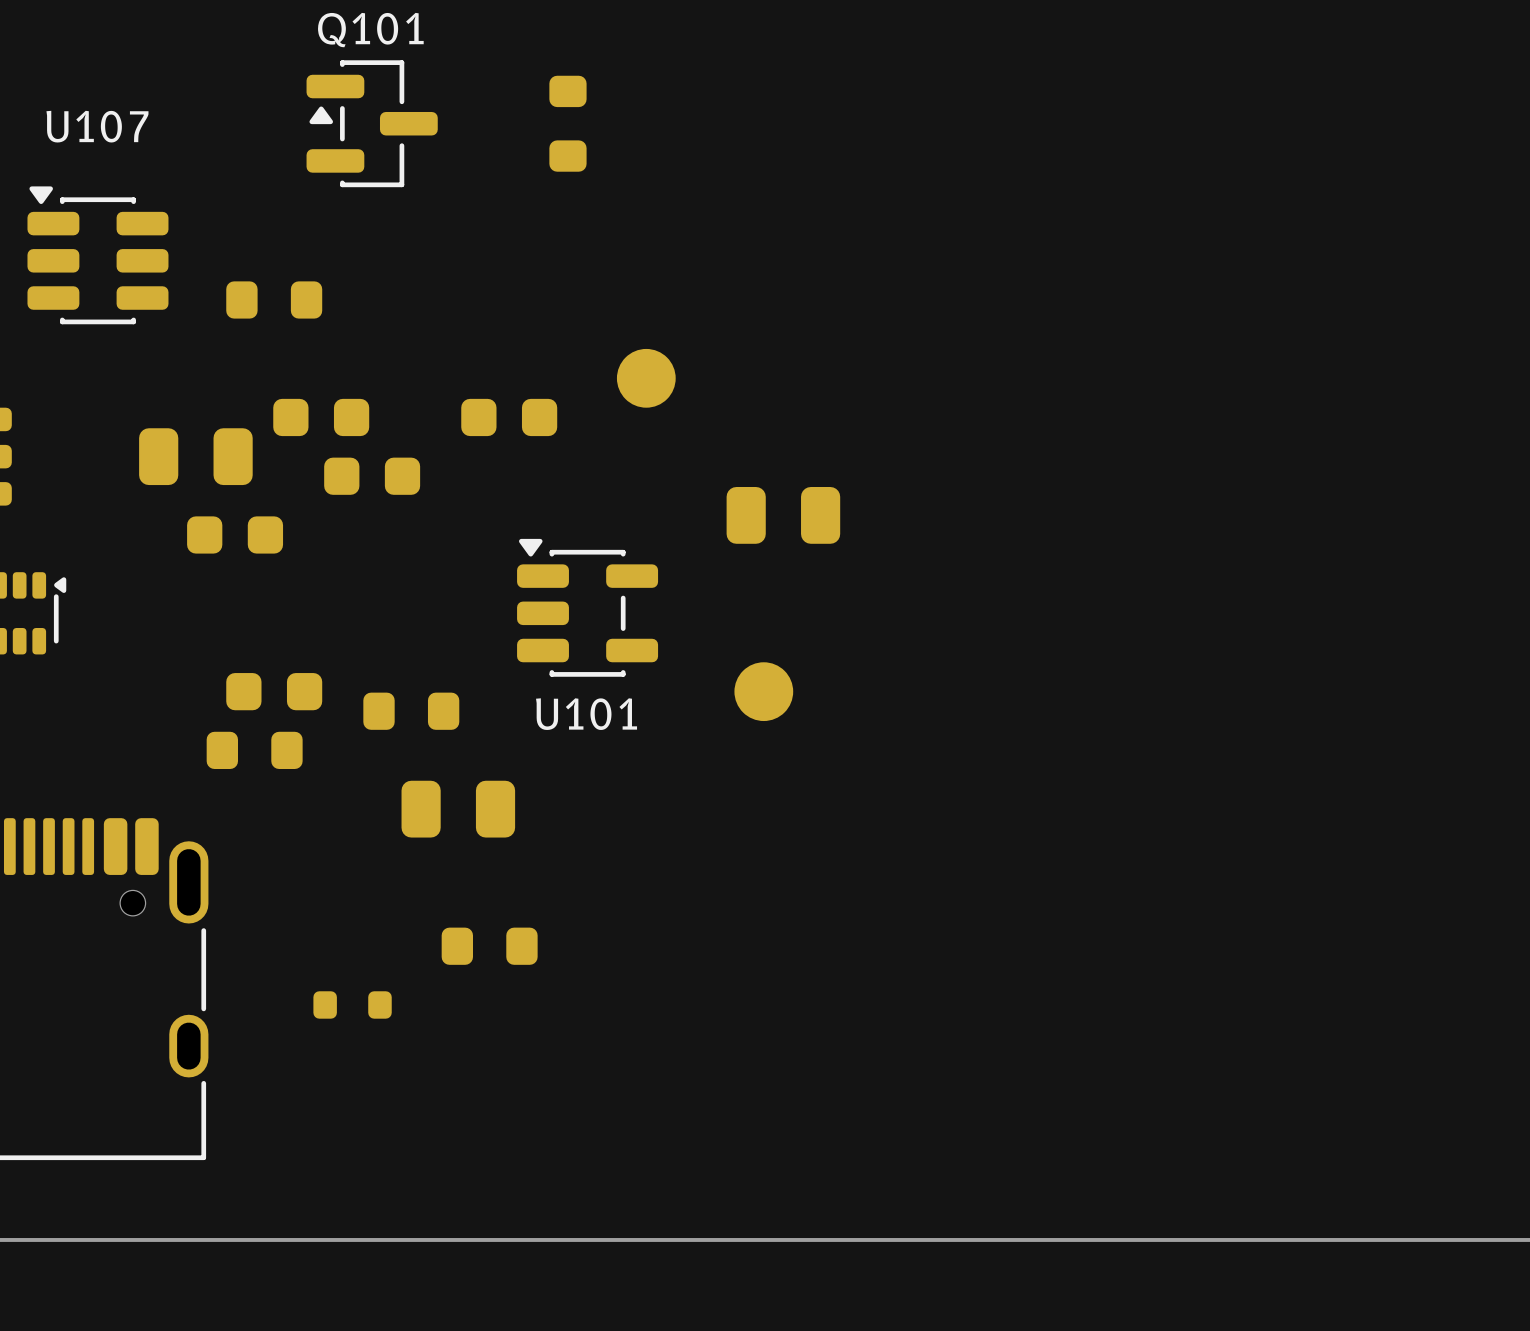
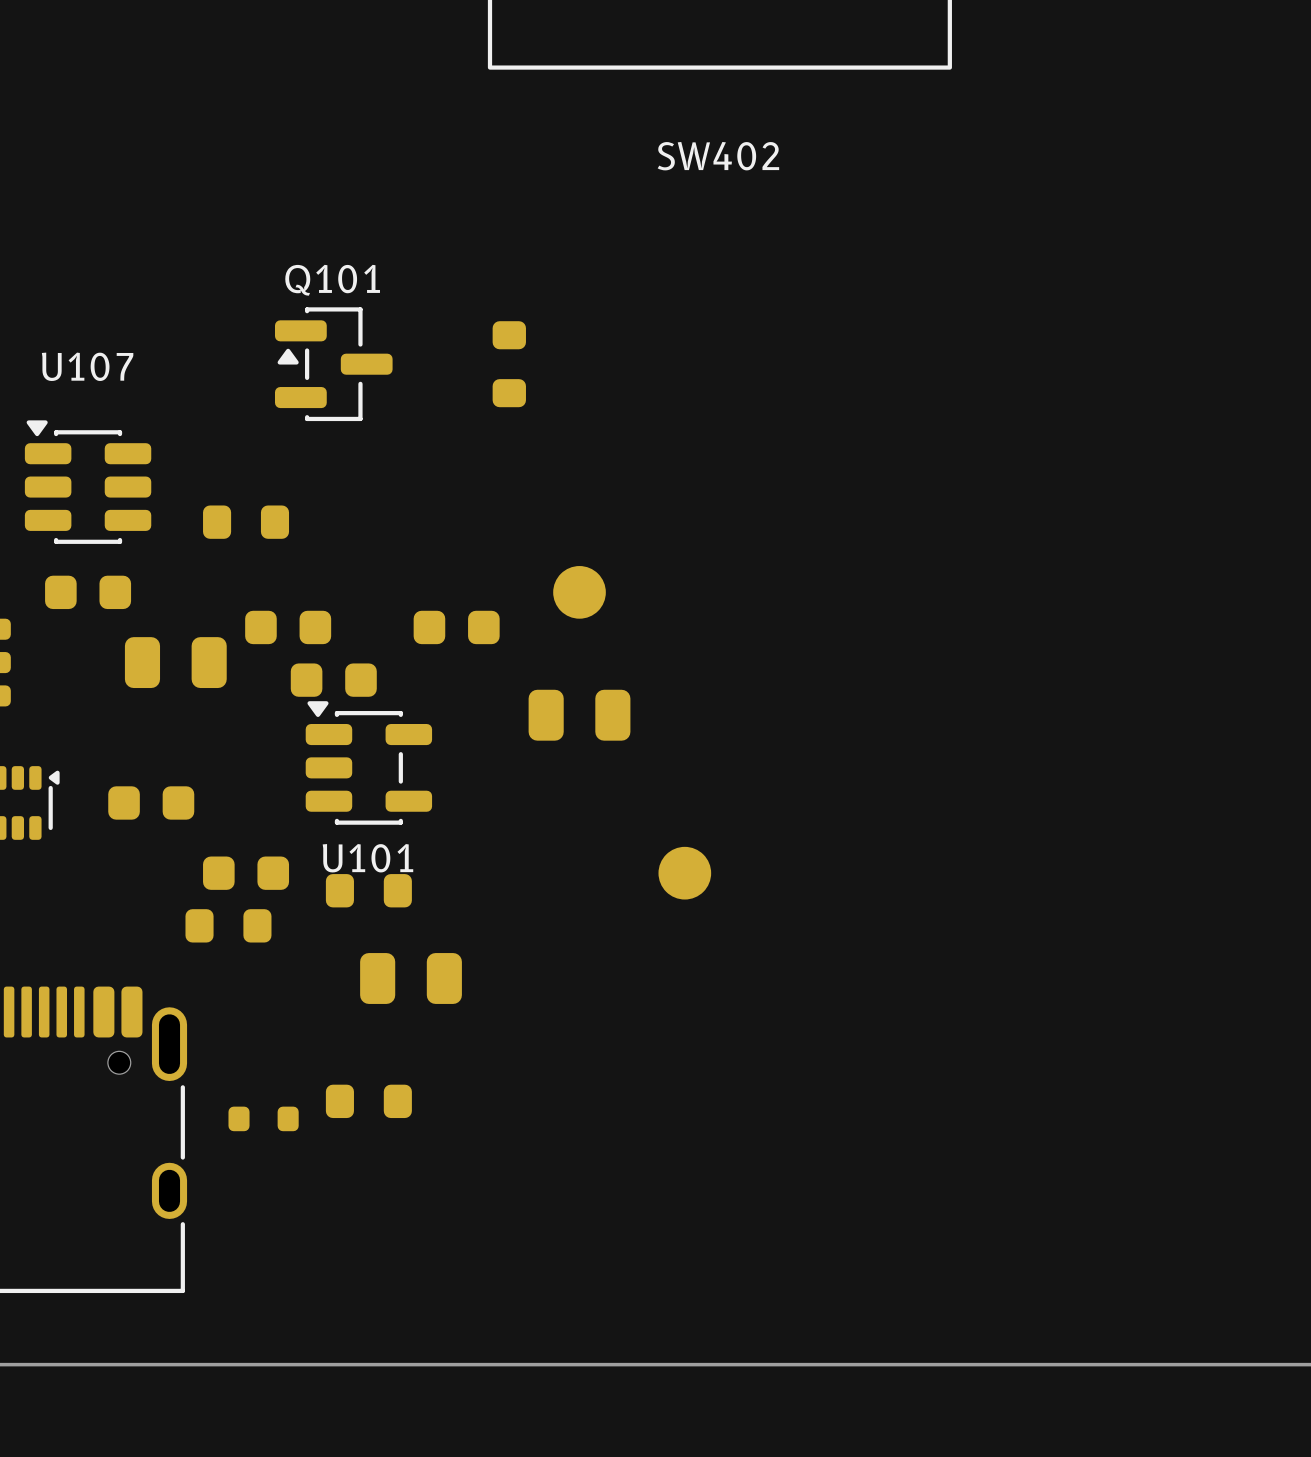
part: none -> (88, 592)
part position: (783, 515) -> (579, 715)
part position: (235, 534) -> (151, 802)
U101 position: (587, 607) -> (368, 762)
part position: (489, 946) -> (368, 1101)
part position: (352, 1004) -> (263, 1118)

